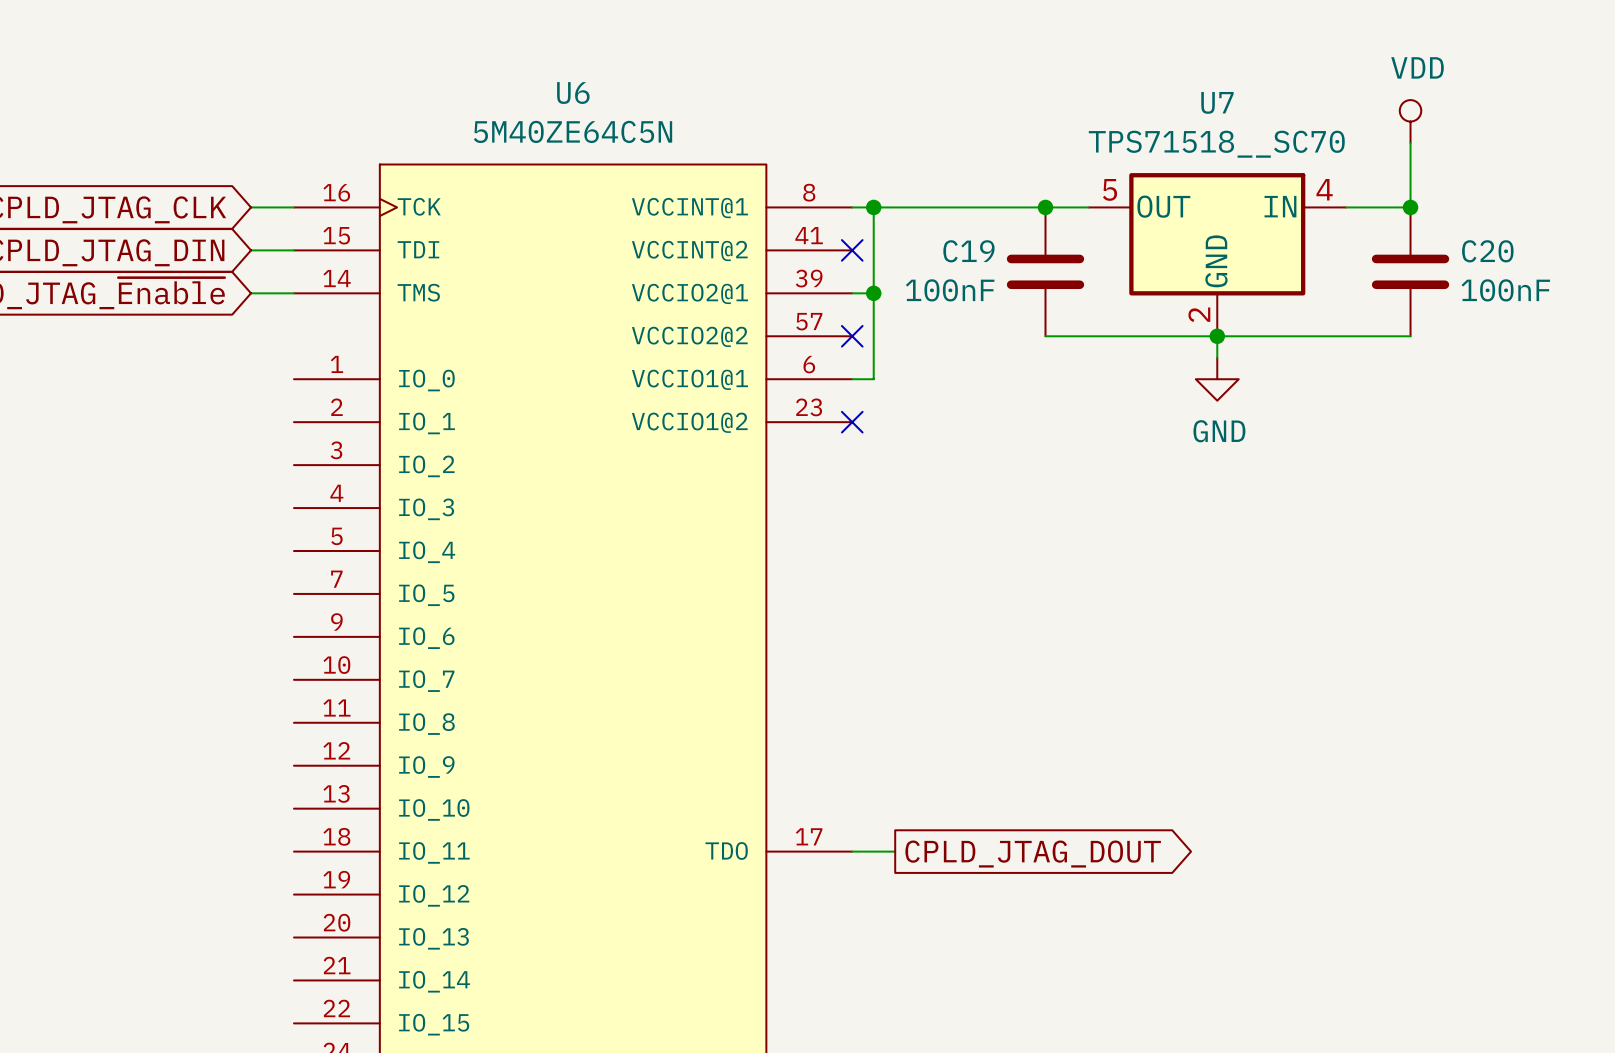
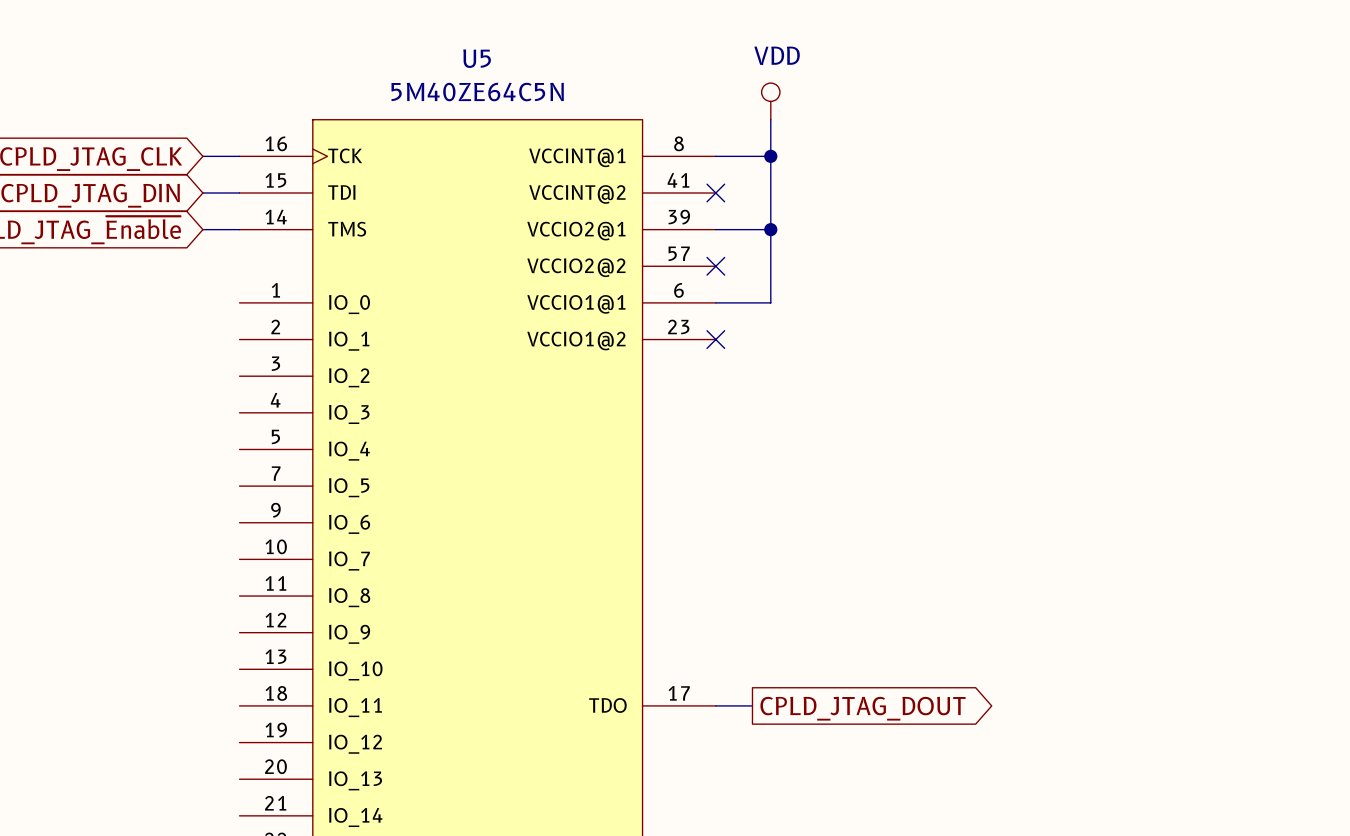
U6 name: U6 (573, 93) -> U5 (477, 58)
power symbol: VDD (1410, 121) -> none
power symbol: none -> VDD (770, 101)
wire: (1410, 143) (1410, 207) (1346, 207) -> none
wire: (873, 207) (873, 379) -> (770, 119) (770, 302) (734, 302)
junction position: (873, 207) -> (770, 156)
wire: (916, 207) (1088, 207) -> none
junction: (1045, 207) -> none
junction: (1410, 207) -> none
U7: TPS71518__SC70 (1217, 254) -> none
C19: 100nF (1045, 271) -> none
C20: 100nF (1410, 271) -> none
wire: none -> (734, 229) (770, 229)
junction position: (873, 293) -> (770, 229)
wire: (1045, 336) (1410, 336) -> none
wire: (1217, 336) (1217, 357) -> none
junction: (1217, 336) -> none
power symbol: GND (1217, 379) -> none

